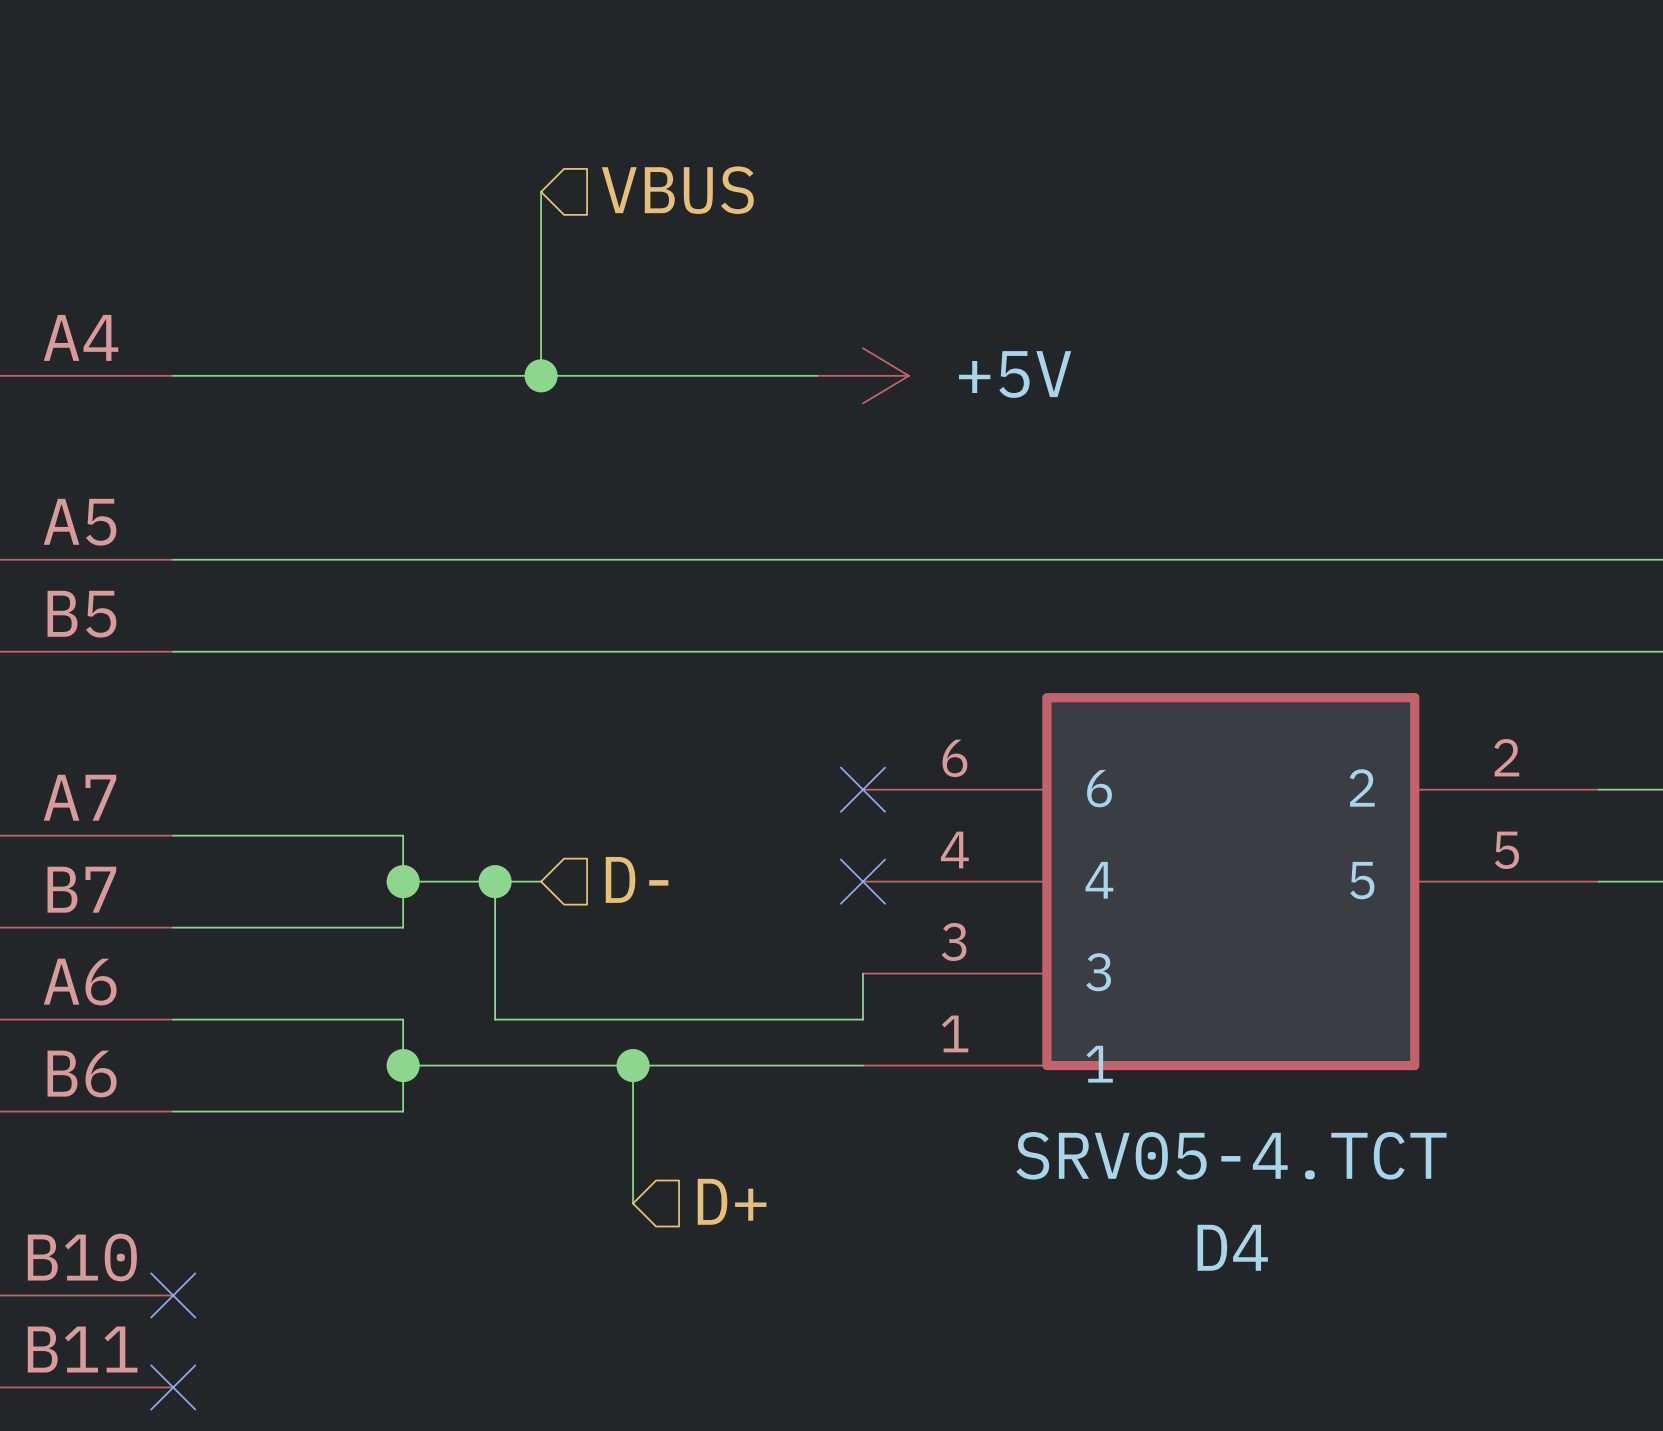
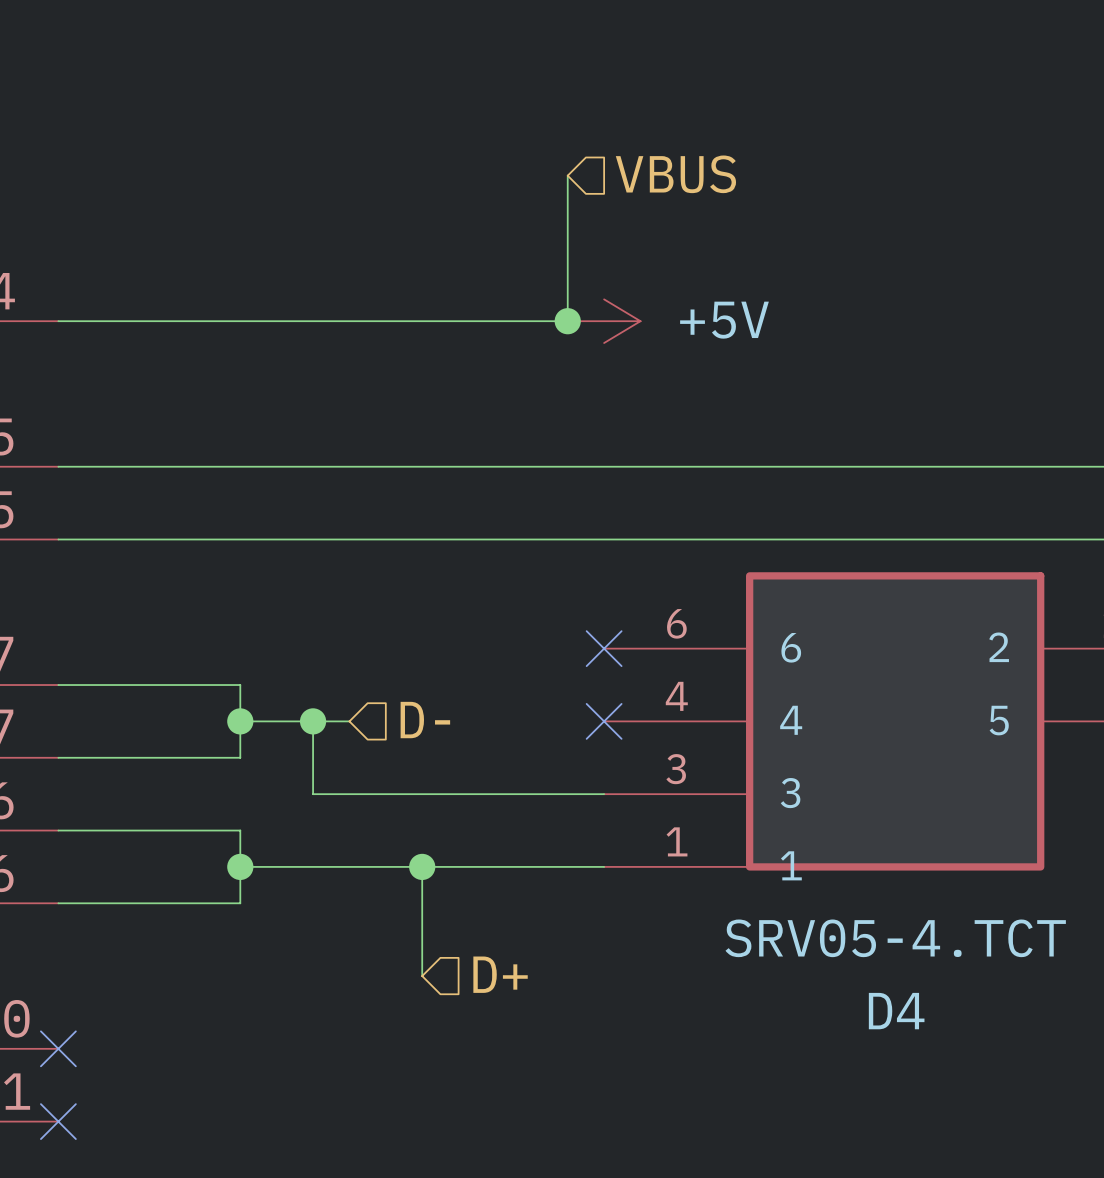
hierarchical label position: VBUS (677, 190) -> VBUS (675, 174)
wire: (541, 191) (541, 375) -> (567, 175) (567, 321)
junction: (541, 375) -> none
junction: none -> (567, 321)
wire: (495, 973) (495, 1019) (862, 1019) (862, 973) -> (313, 794) (604, 794)

